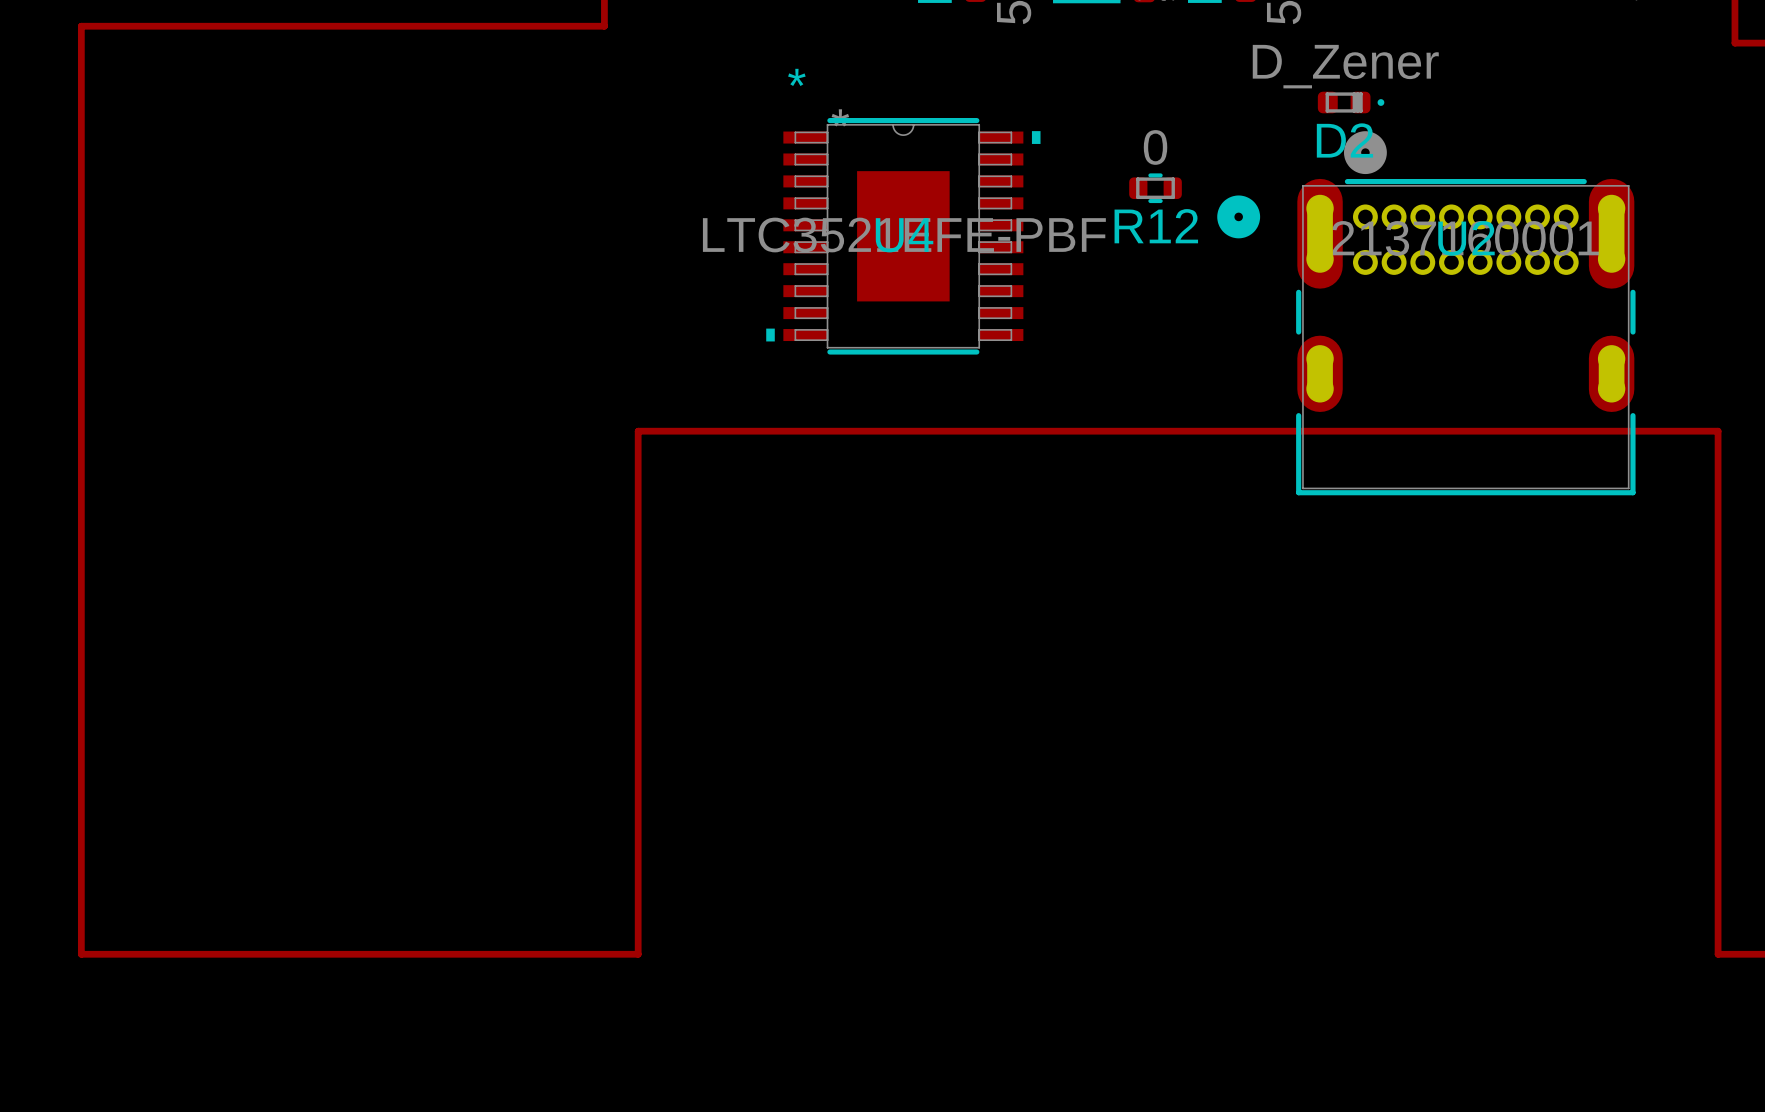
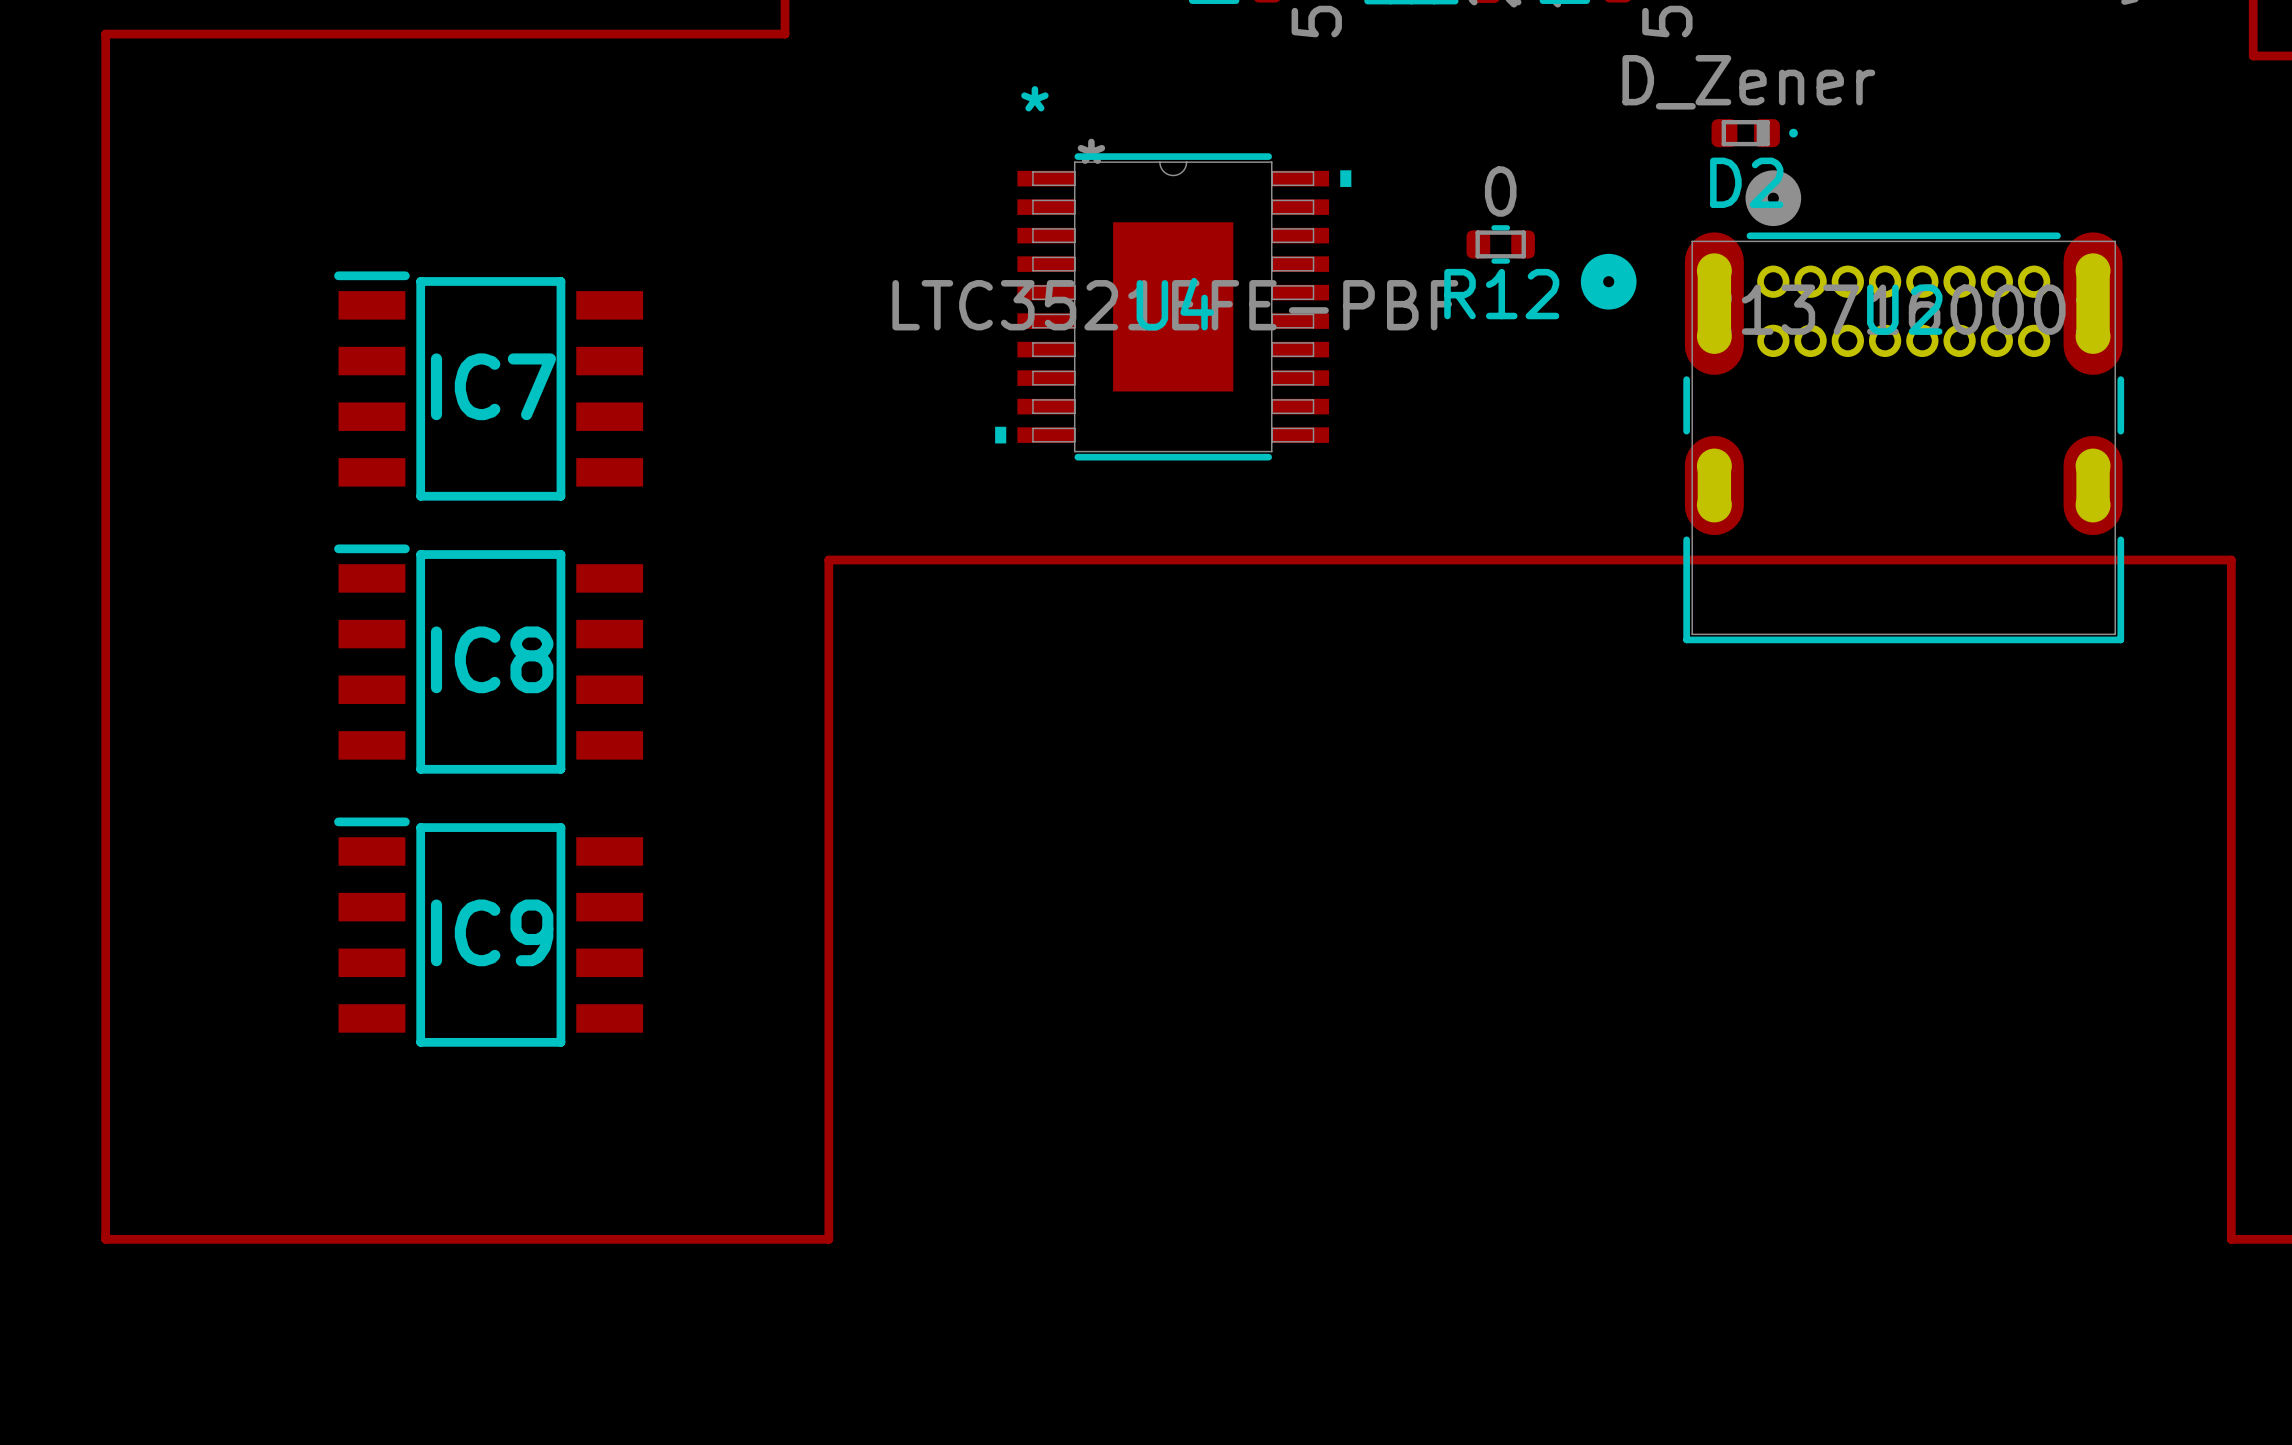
IC7: none -> (488, 386)
IC8: none -> (488, 659)
IC9: none -> (488, 932)

